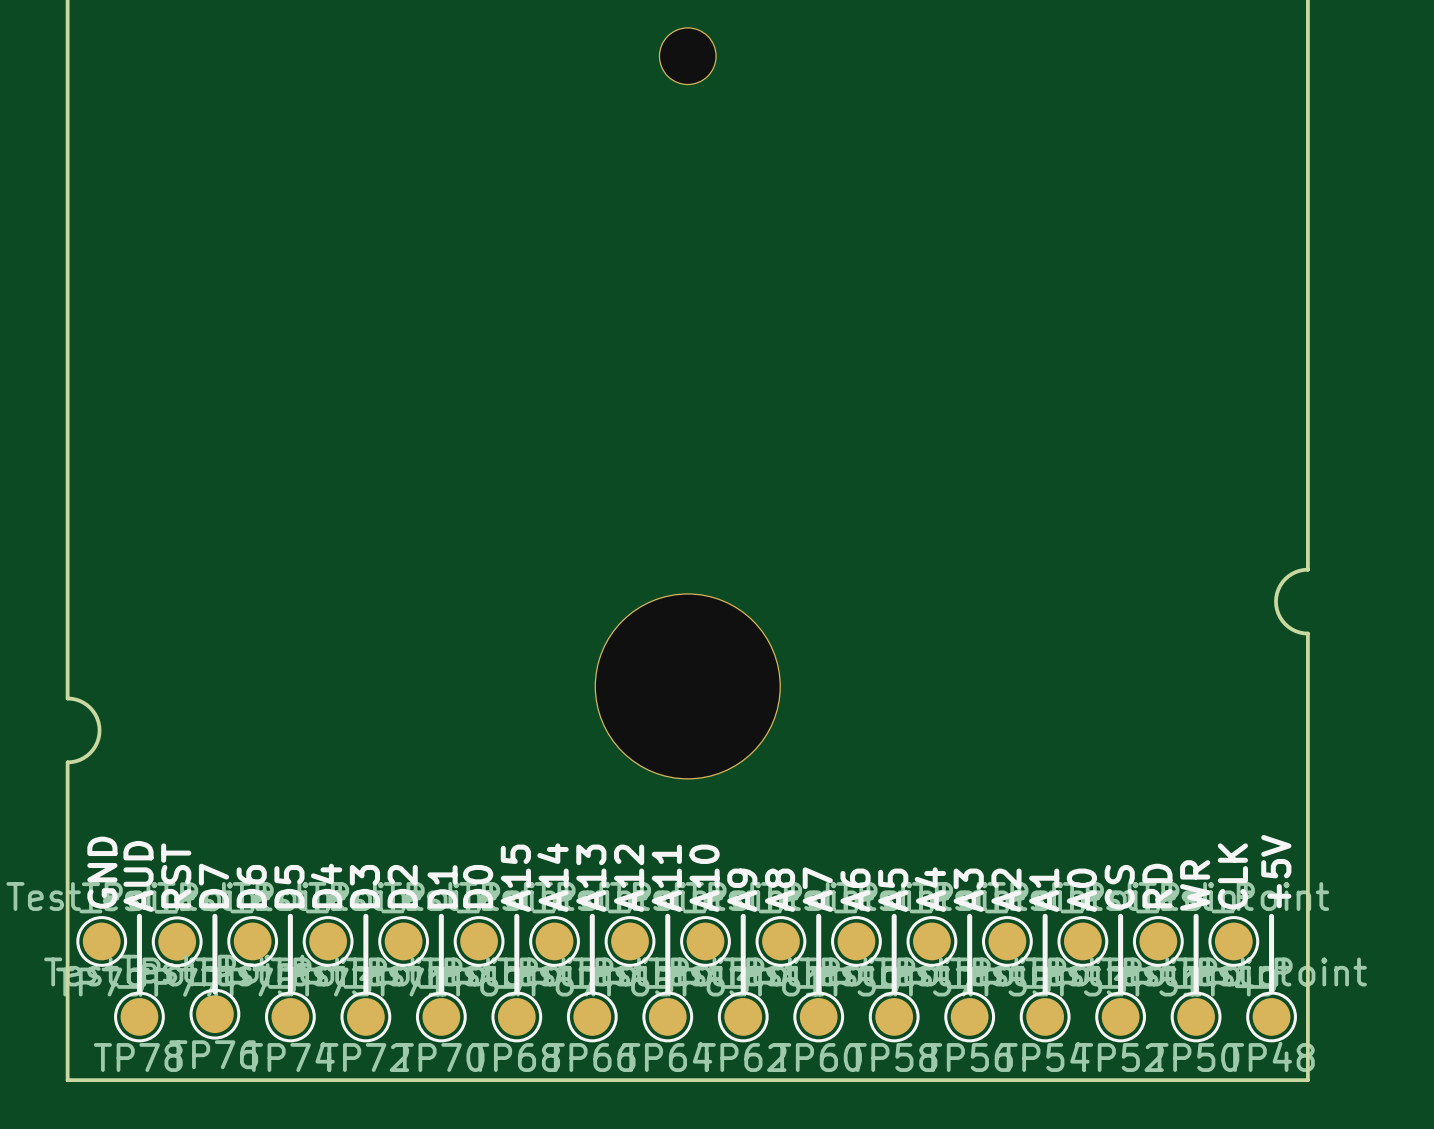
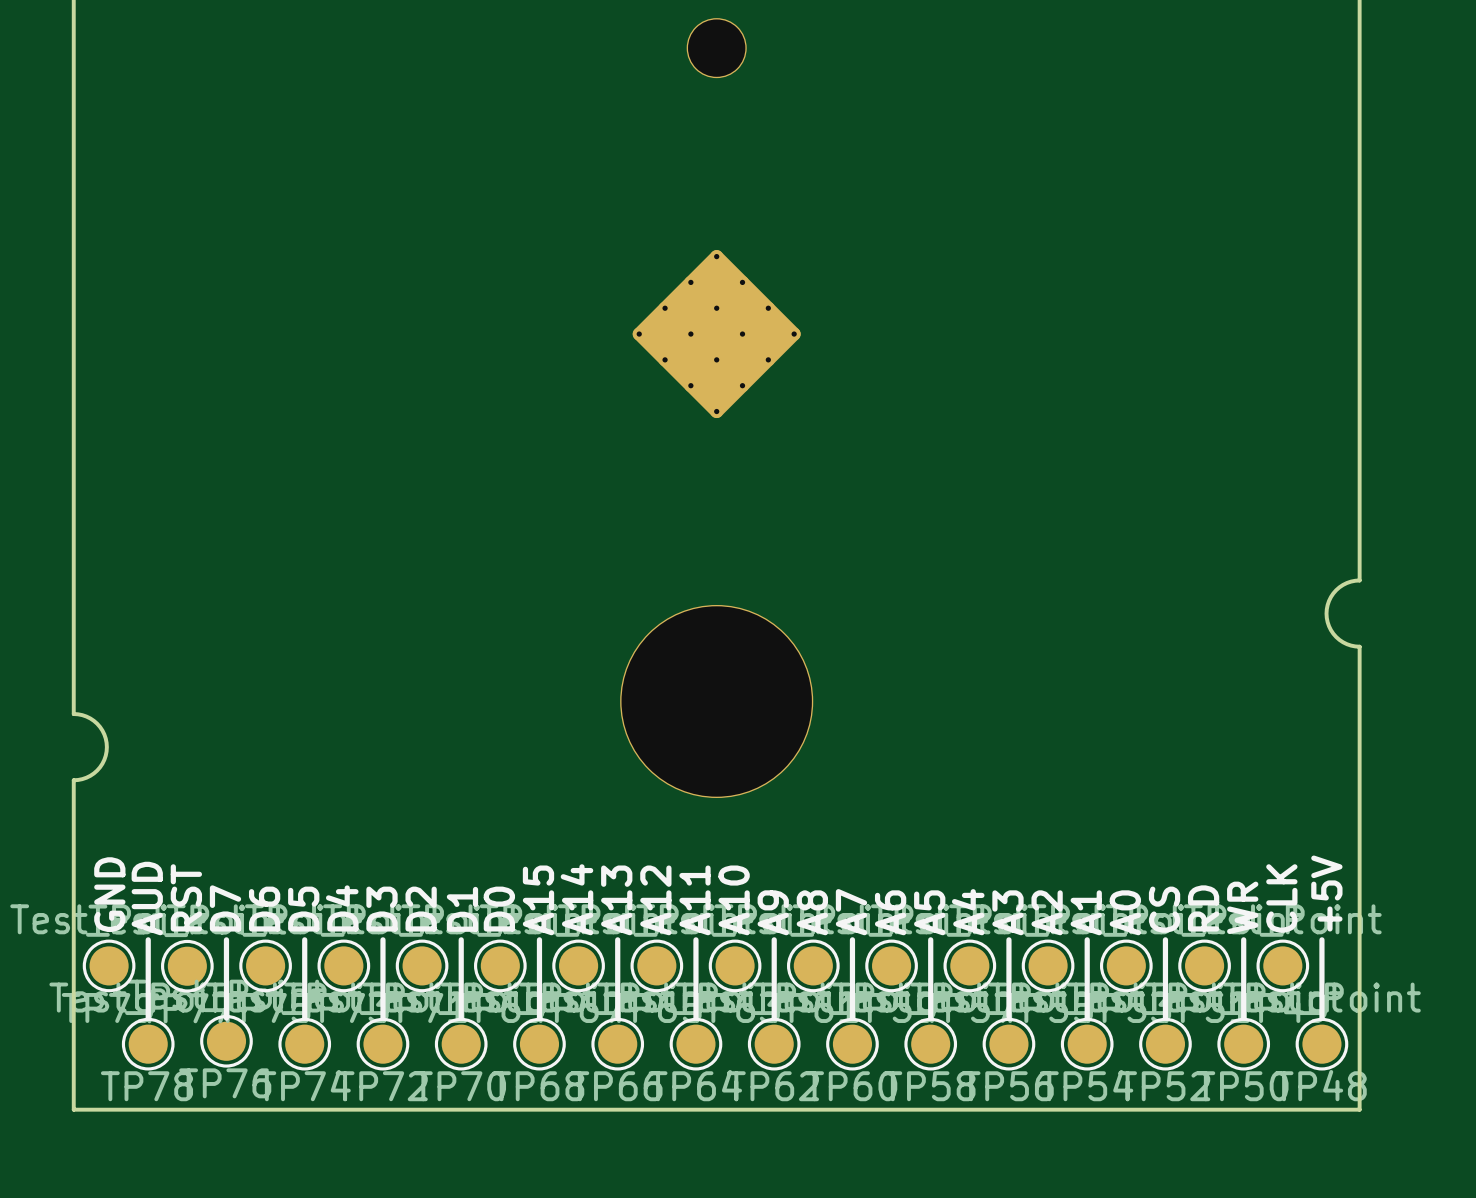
part: none -> (716, 334)

